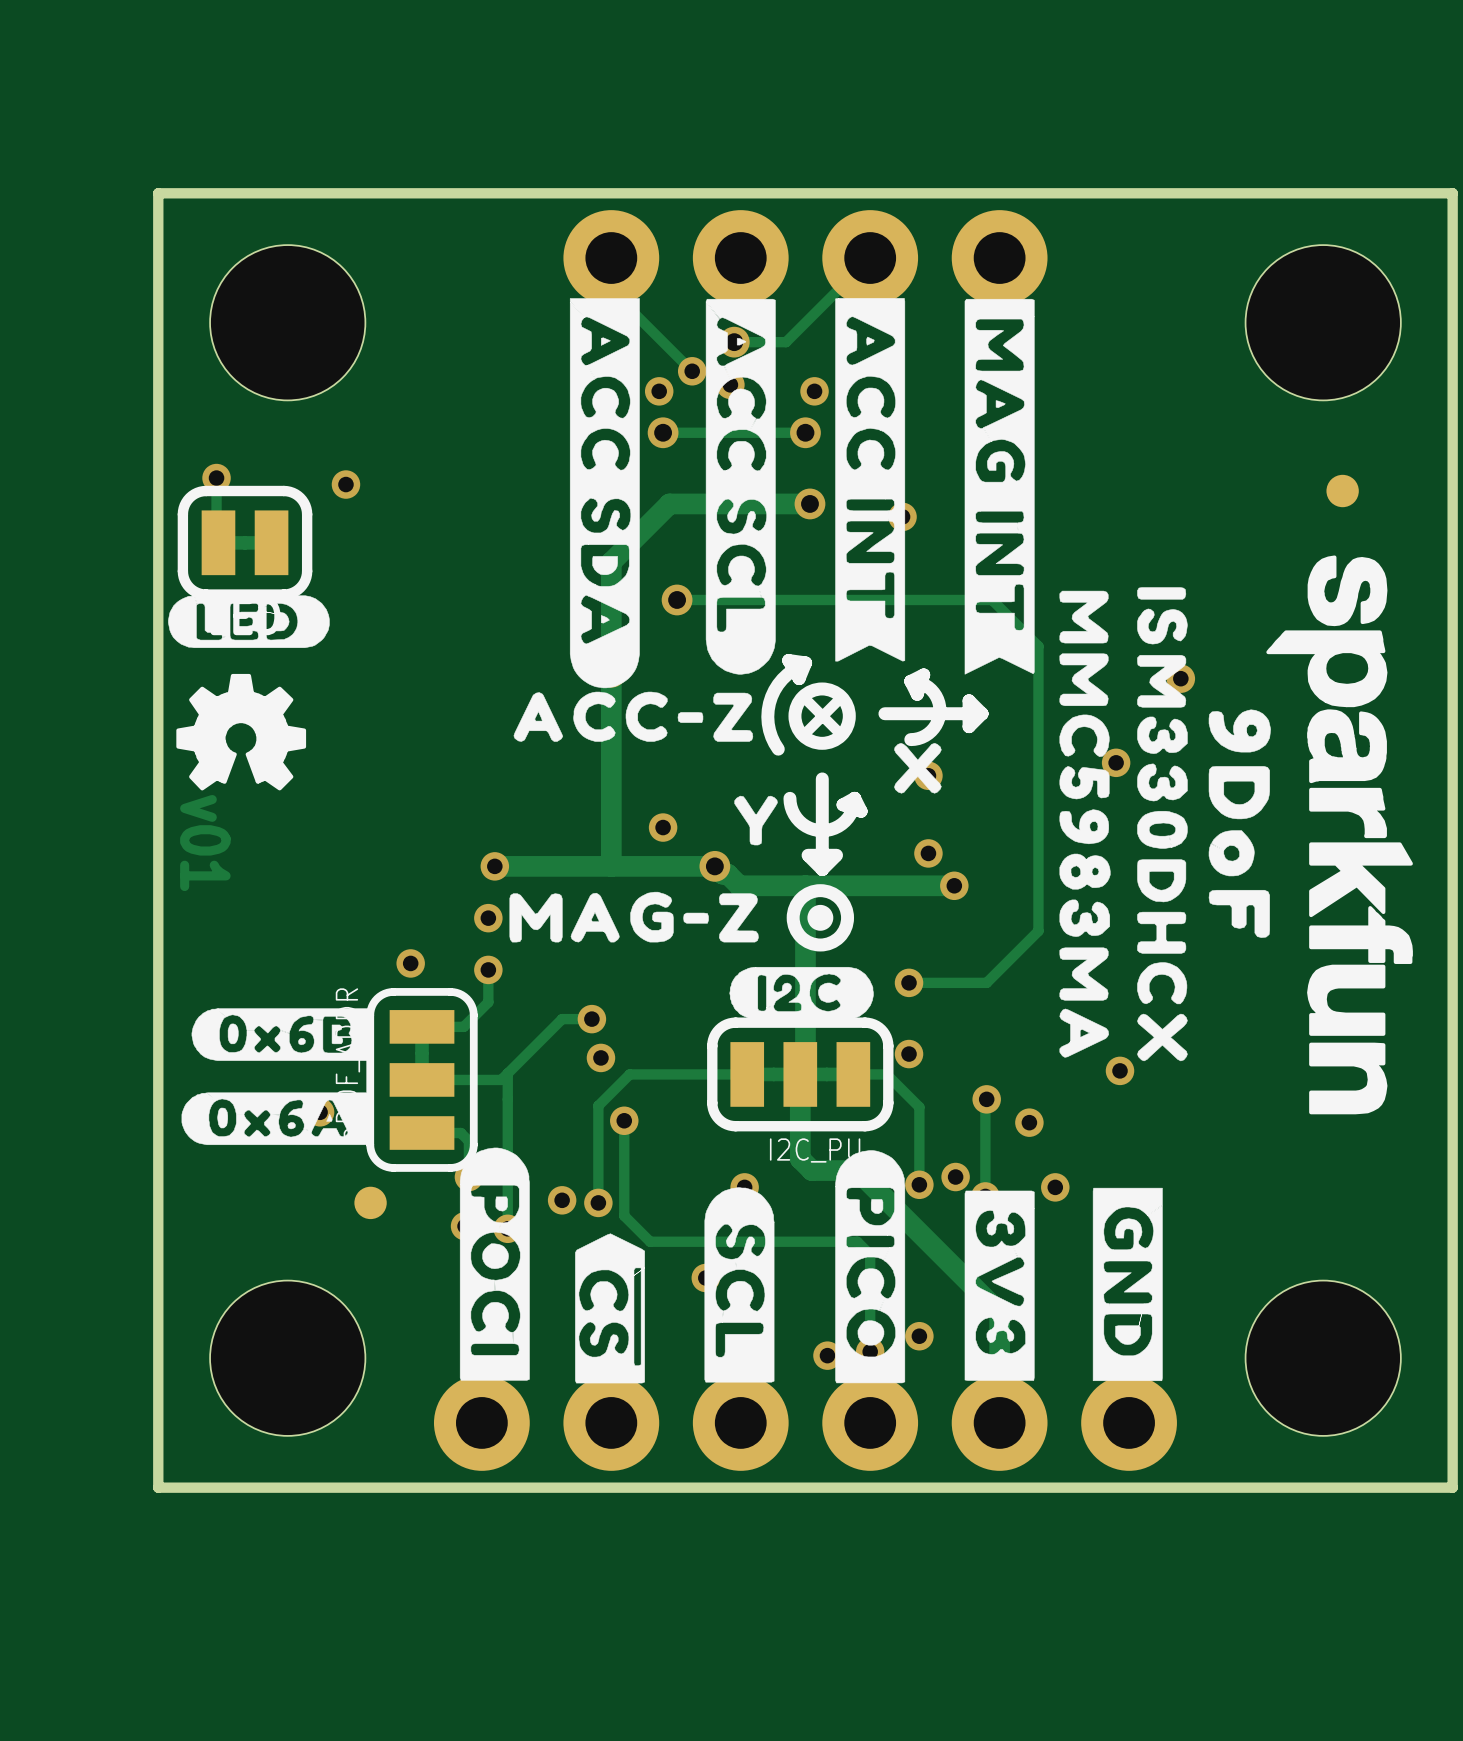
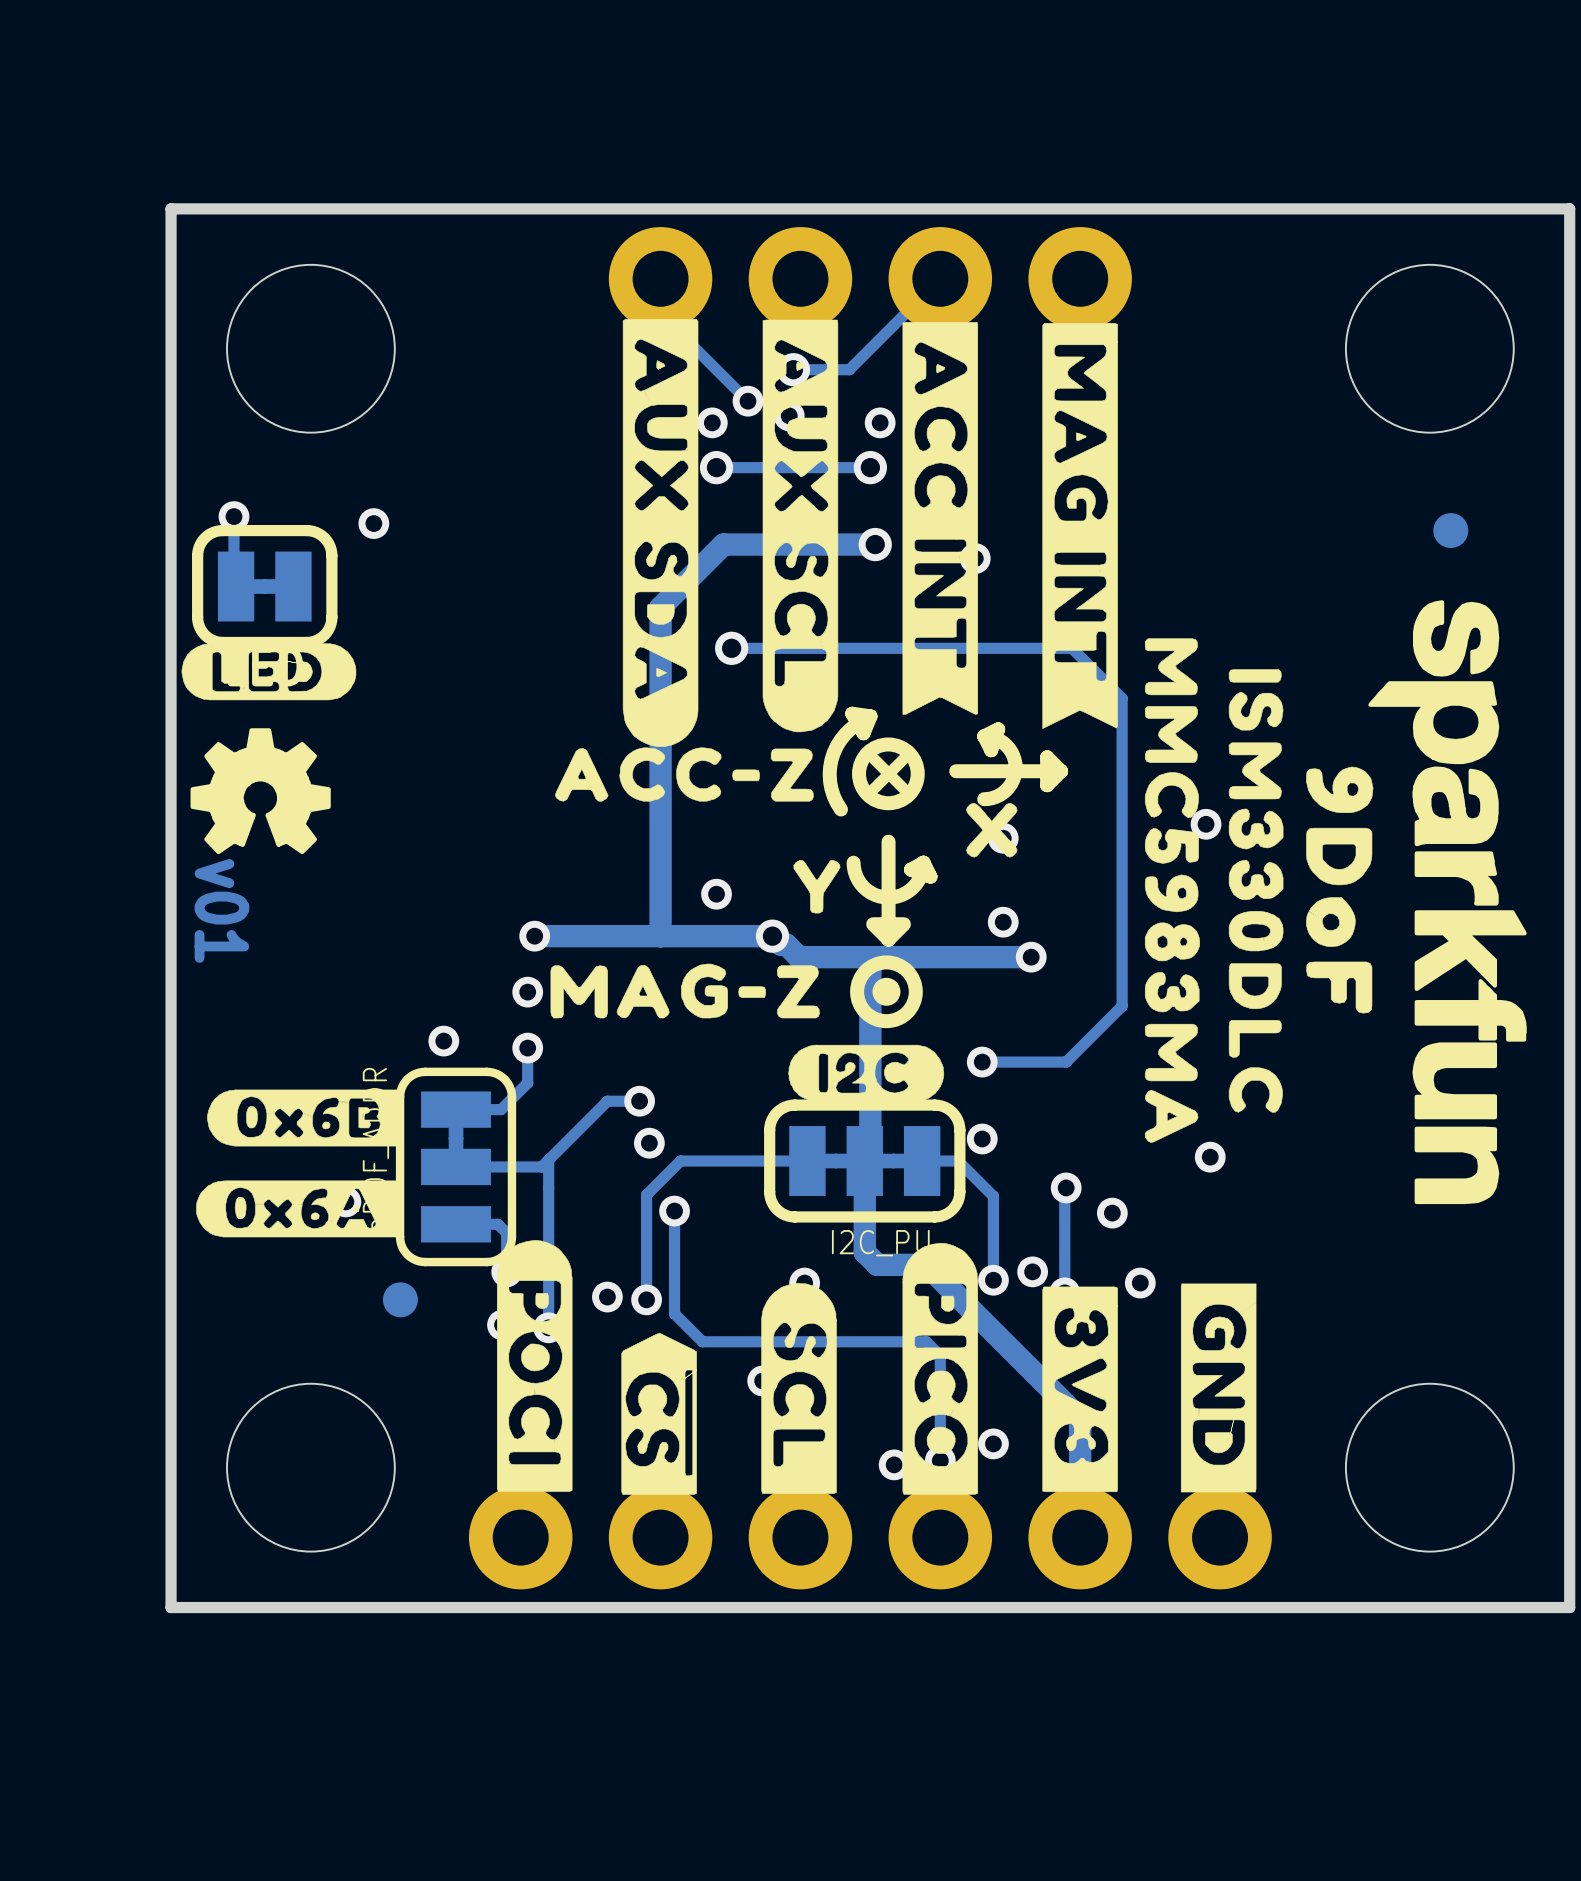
drawing shape: [569, 298, 640, 689] -> [622, 319, 699, 747]
drawing shape: [705, 298, 776, 675] -> [762, 319, 839, 733]
drawing shape: [1137, 587, 1188, 1062] -> [1228, 669, 1284, 1113]
via: (1180, 678) -> none

